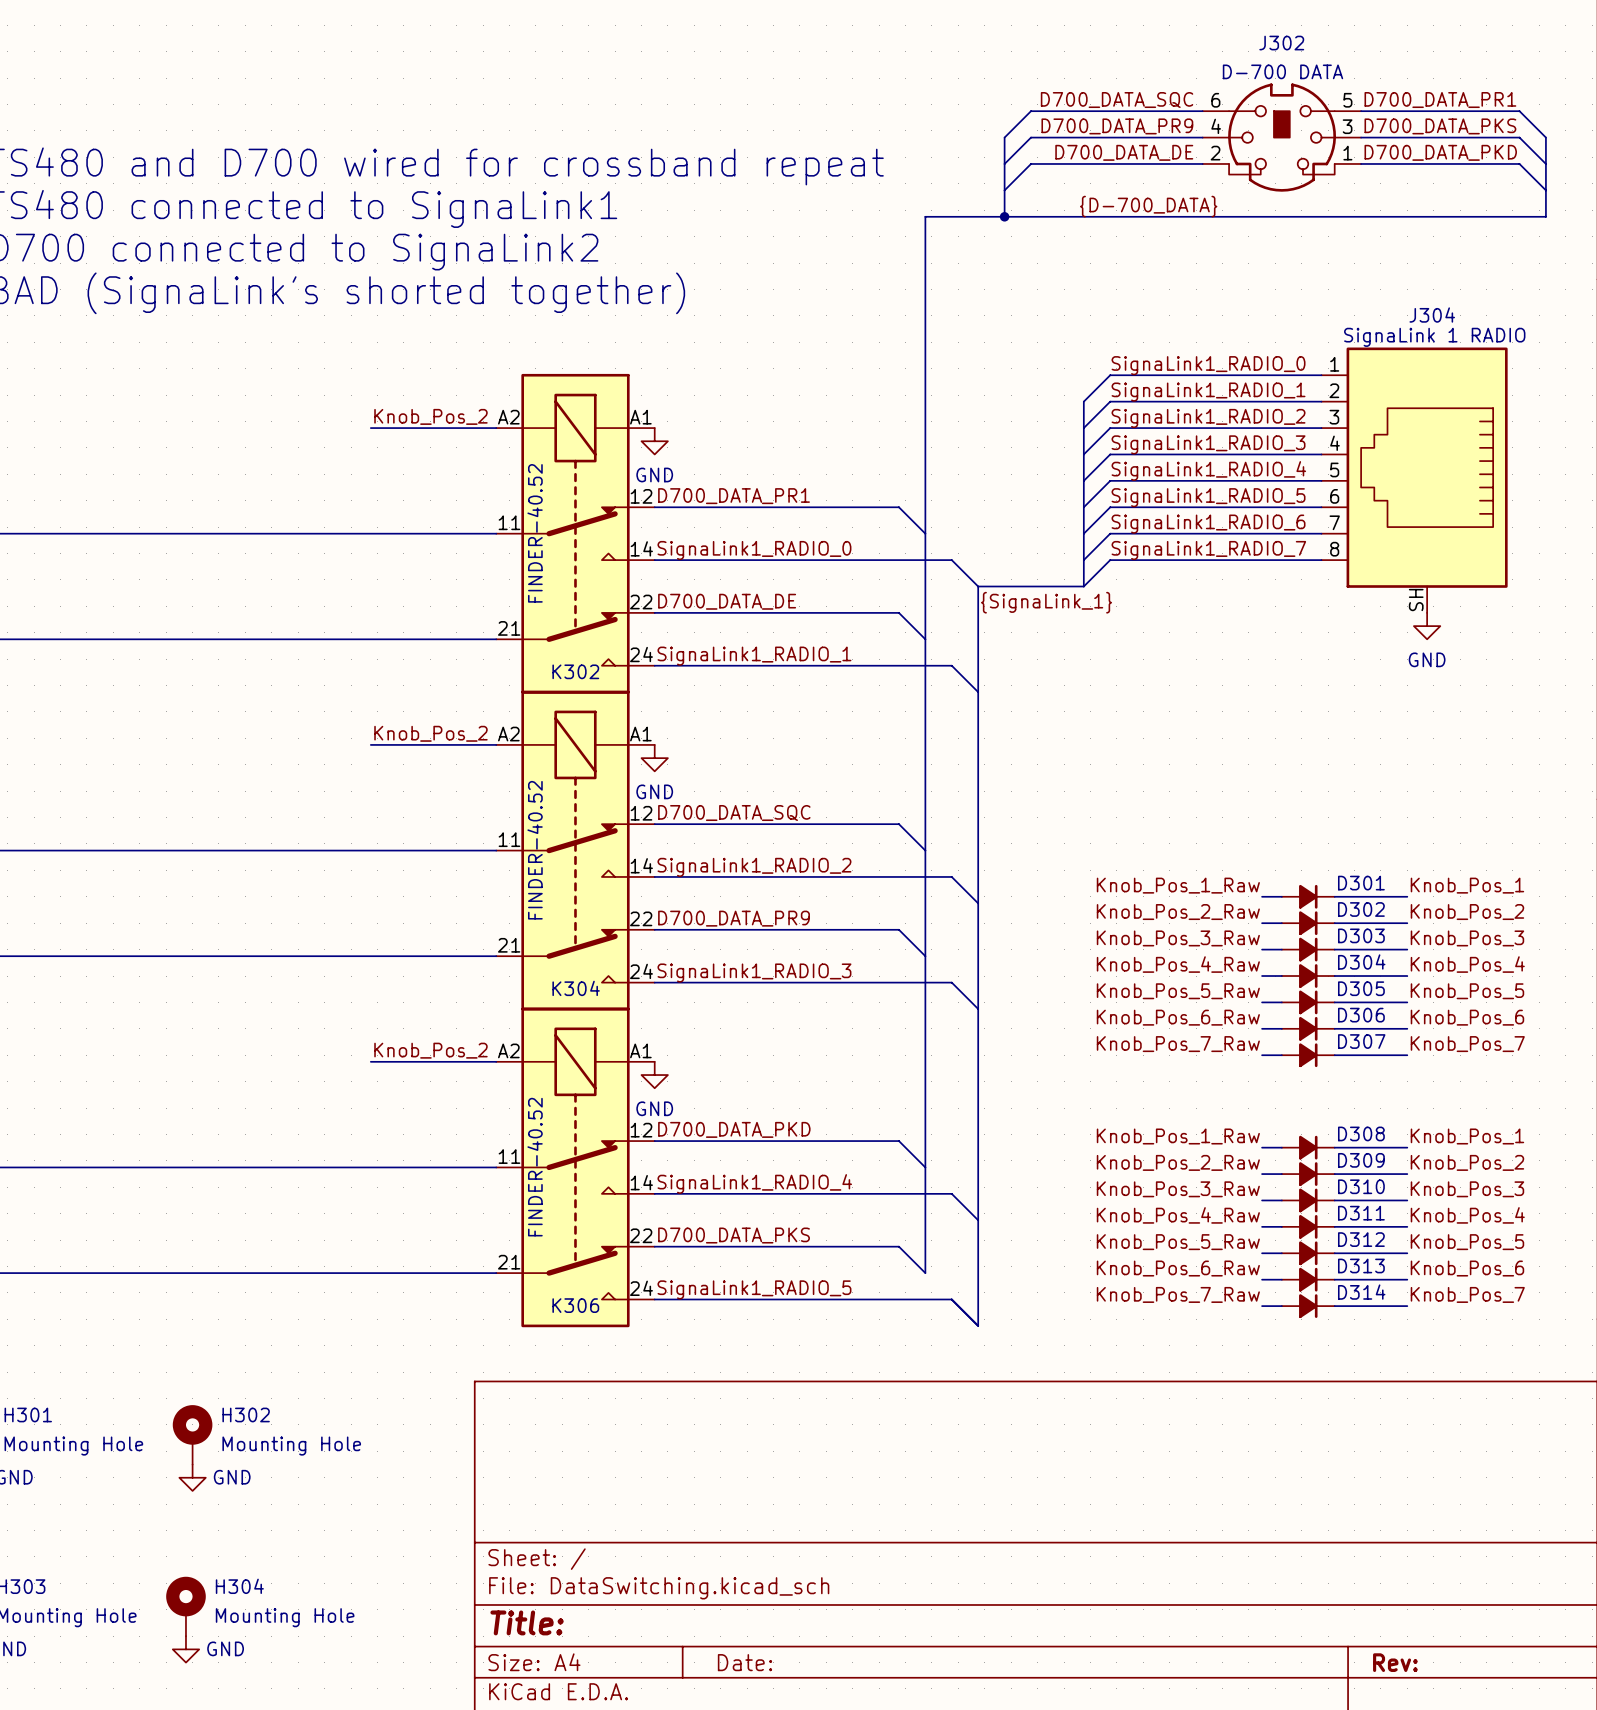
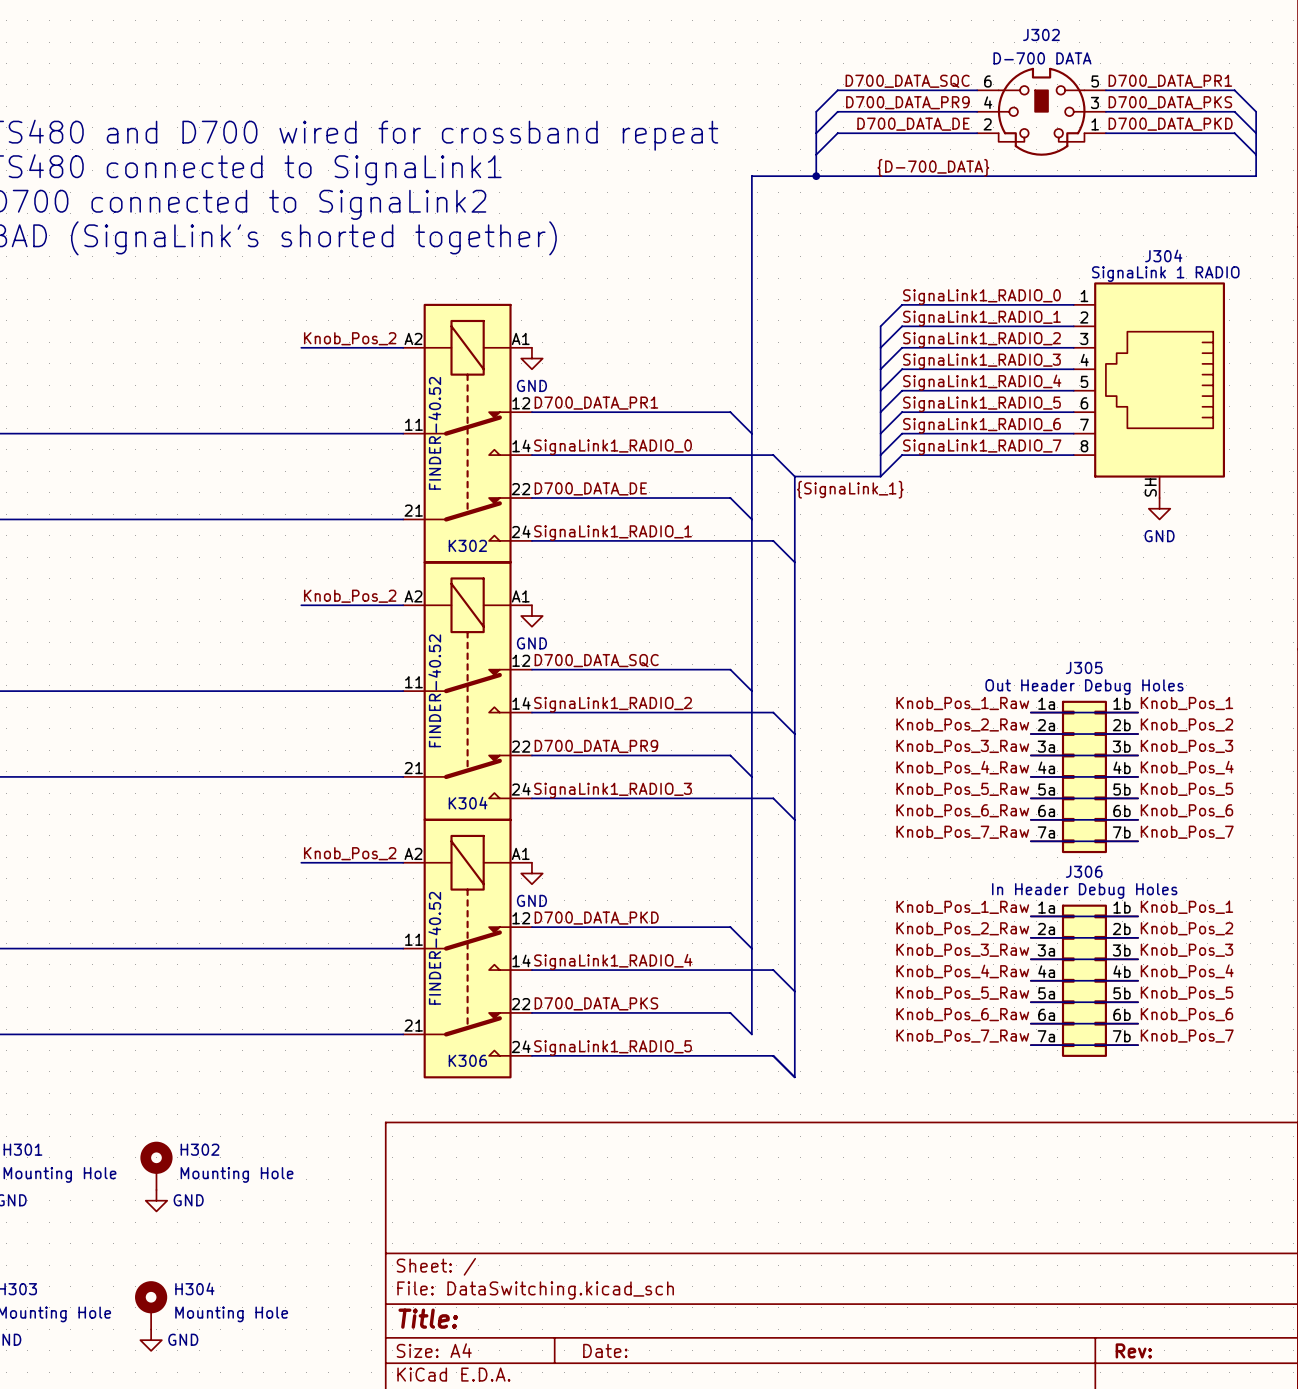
wire: none -> (1030, 712) (1138, 712)
label position: Knob_Pos_1_Raw (1178, 885) -> Knob_Pos_1_Raw (962, 703)
label position: Knob_Pos_1 (1467, 885) -> Knob_Pos_1 (1186, 703)
wire: (1262, 896) (1281, 896) -> none
D301: (1308, 896) -> none
wire: (1334, 896) (1407, 896) -> none
wire: none -> (1030, 734) (1138, 734)
label position: Knob_Pos_2_Raw (1178, 912) -> Knob_Pos_2_Raw (962, 724)
label position: Knob_Pos_2 (1467, 912) -> Knob_Pos_2 (1186, 724)
wire: (1262, 923) (1281, 923) -> none
D302: (1308, 923) -> none
wire: (1334, 923) (1407, 923) -> none
wire: none -> (1030, 755) (1138, 755)
label position: Knob_Pos_3_Raw (1178, 938) -> Knob_Pos_3_Raw (962, 746)
label position: Knob_Pos_3 (1467, 938) -> Knob_Pos_3 (1186, 746)
wire: (1262, 949) (1281, 949) -> none
D303: (1308, 949) -> none
wire: (1334, 949) (1407, 949) -> none
wire: none -> (1030, 776) (1138, 776)
J305: none -> Out Header Debug Holes (1084, 776)
label position: Knob_Pos_4_Raw (1178, 964) -> Knob_Pos_4_Raw (962, 767)
label position: Knob_Pos_4 (1467, 964) -> Knob_Pos_4 (1187, 767)
wire: (1262, 976) (1281, 976) -> none
D304: (1308, 976) -> none
wire: (1334, 976) (1407, 976) -> none
wire: none -> (1030, 798) (1138, 798)
label position: Knob_Pos_5_Raw (1178, 991) -> Knob_Pos_5_Raw (962, 789)
label position: Knob_Pos_5 (1467, 991) -> Knob_Pos_5 (1186, 789)
wire: (1262, 1002) (1281, 1002) -> none
D305: (1308, 1002) -> none
wire: (1334, 1002) (1407, 1002) -> none
wire: none -> (1030, 819) (1138, 819)
label position: Knob_Pos_6_Raw (1178, 1017) -> Knob_Pos_6_Raw (962, 810)
label position: Knob_Pos_6 (1467, 1017) -> Knob_Pos_6 (1186, 810)
wire: (1262, 1028) (1281, 1028) -> none
D306: (1308, 1028) -> none
wire: (1334, 1028) (1407, 1028) -> none
wire: none -> (1030, 841) (1138, 841)
label position: Knob_Pos_7_Raw (1178, 1044) -> Knob_Pos_7_Raw (962, 832)
label position: Knob_Pos_7 (1467, 1044) -> Knob_Pos_7 (1187, 832)
wire: (1262, 1055) (1281, 1055) -> none
D307: (1308, 1055) -> none
wire: (1334, 1055) (1407, 1055) -> none
wire: none -> (1030, 916) (1138, 916)
label position: Knob_Pos_1_Raw (1178, 1136) -> Knob_Pos_1_Raw (962, 907)
label position: Knob_Pos_1 (1467, 1136) -> Knob_Pos_1 (1186, 907)
wire: (1262, 1147) (1281, 1147) -> none
D308: (1308, 1147) -> none
wire: (1334, 1147) (1407, 1147) -> none
wire: none -> (1030, 937) (1138, 937)
label position: Knob_Pos_2_Raw (1178, 1162) -> Knob_Pos_2_Raw (962, 928)
label position: Knob_Pos_2 (1467, 1162) -> Knob_Pos_2 (1186, 928)
wire: (1262, 1174) (1281, 1174) -> none
D309: (1308, 1174) -> none
wire: (1334, 1174) (1407, 1174) -> none
wire: none -> (1030, 959) (1138, 959)
label position: Knob_Pos_3_Raw (1178, 1189) -> Knob_Pos_3_Raw (962, 950)
label position: Knob_Pos_3 (1467, 1189) -> Knob_Pos_3 (1186, 950)
wire: (1262, 1200) (1281, 1200) -> none
D310: (1308, 1200) -> none
wire: (1334, 1200) (1407, 1200) -> none
wire: none -> (1030, 980) (1138, 980)
J306: none -> In Header Debug Holes (1084, 980)
label position: Knob_Pos_4_Raw (1178, 1215) -> Knob_Pos_4_Raw (962, 971)
label position: Knob_Pos_4 (1467, 1215) -> Knob_Pos_4 (1187, 971)
wire: (1262, 1226) (1281, 1226) -> none
D311: (1308, 1226) -> none
wire: (1334, 1226) (1407, 1226) -> none
wire: none -> (1030, 1002) (1138, 1002)
label position: Knob_Pos_5_Raw (1178, 1242) -> Knob_Pos_5_Raw (962, 993)
label position: Knob_Pos_5 (1467, 1242) -> Knob_Pos_5 (1186, 993)
wire: (1262, 1253) (1281, 1253) -> none
D312: (1308, 1253) -> none
wire: (1334, 1253) (1407, 1253) -> none
wire: none -> (1030, 1023) (1138, 1023)
label position: Knob_Pos_6_Raw (1178, 1268) -> Knob_Pos_6_Raw (962, 1014)
label position: Knob_Pos_6 (1467, 1268) -> Knob_Pos_6 (1186, 1014)
wire: (1262, 1279) (1281, 1279) -> none
D313: (1308, 1279) -> none
wire: (1334, 1279) (1407, 1279) -> none
wire: none -> (1030, 1045) (1138, 1045)
label position: Knob_Pos_7_Raw (1178, 1294) -> Knob_Pos_7_Raw (962, 1036)
label position: Knob_Pos_7 (1467, 1294) -> Knob_Pos_7 (1187, 1036)
wire: (1262, 1306) (1281, 1306) -> none
D314: (1308, 1306) -> none
wire: (1334, 1306) (1407, 1306) -> none

